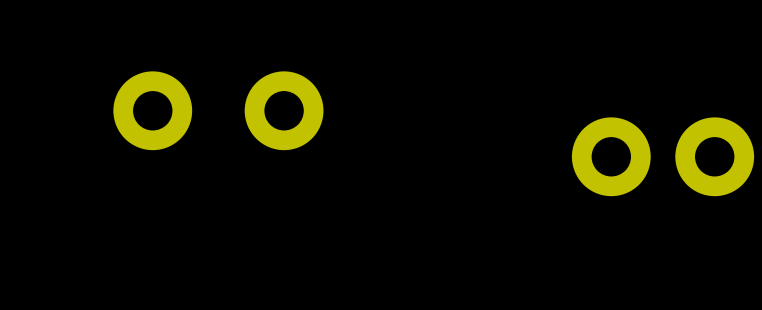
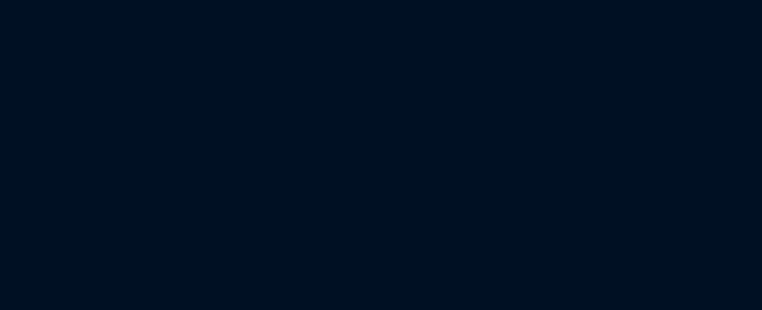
part: (218, 110) -> none
part: (663, 156) -> none

